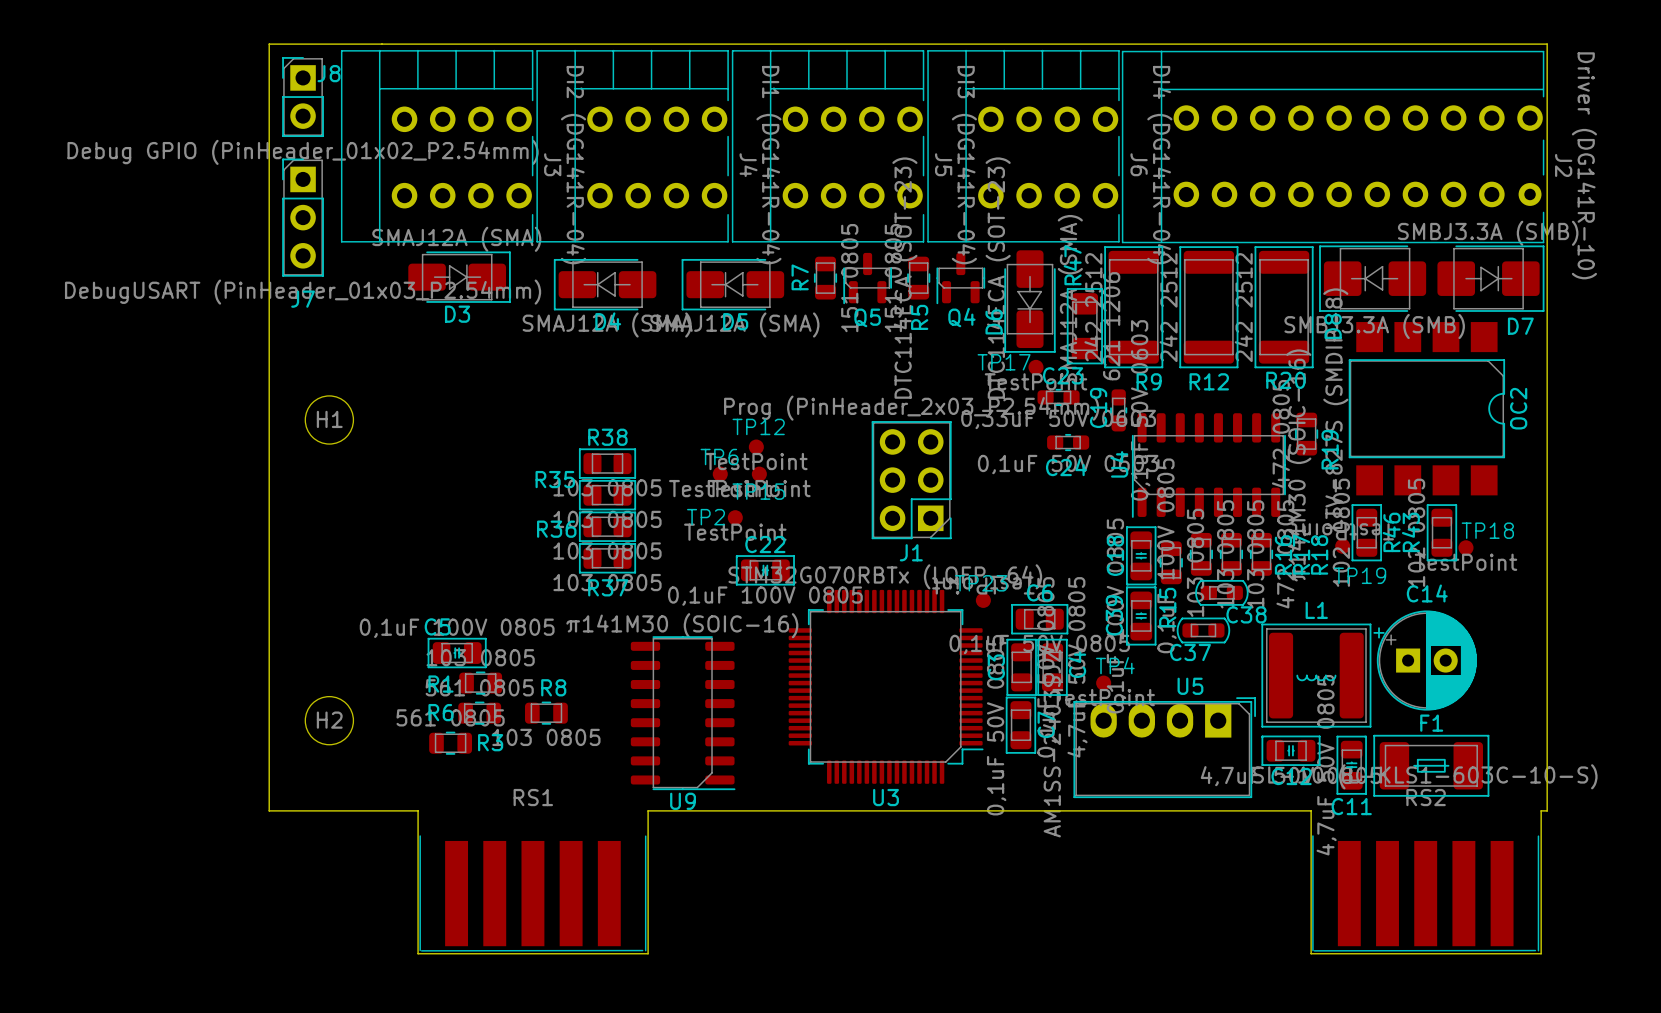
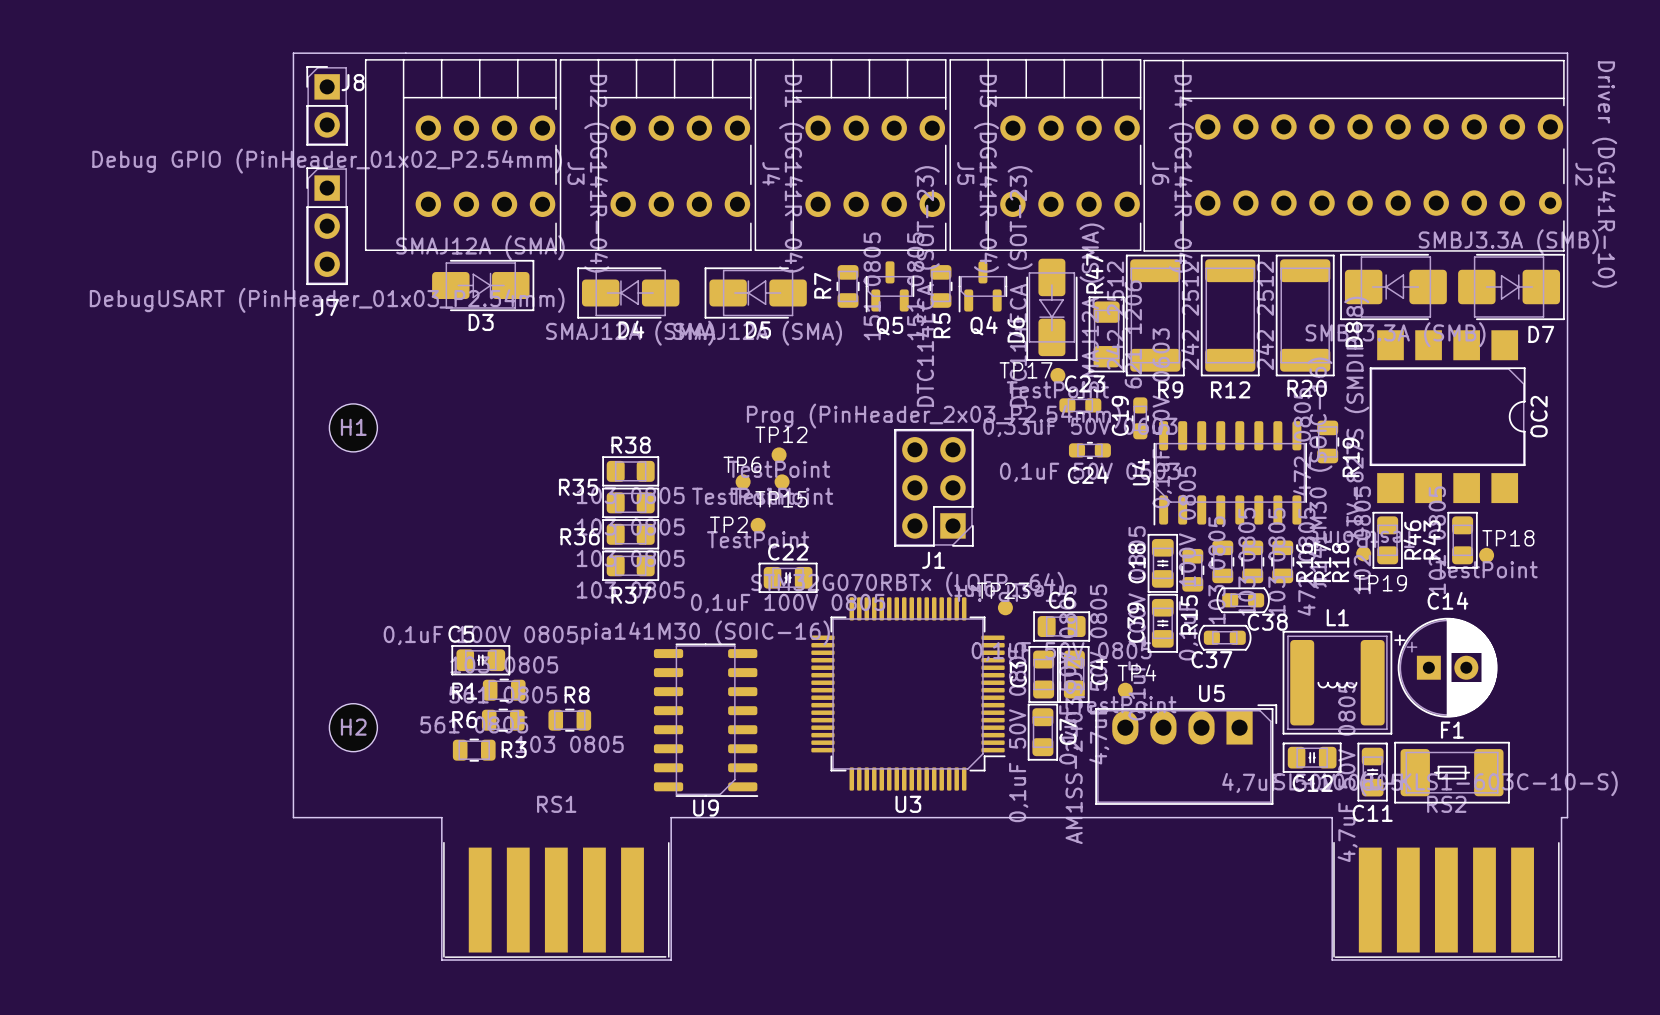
U9 value: π141M30 (SOIC-16) (682, 625) -> pia141M30 (SOIC-16) (705, 632)

